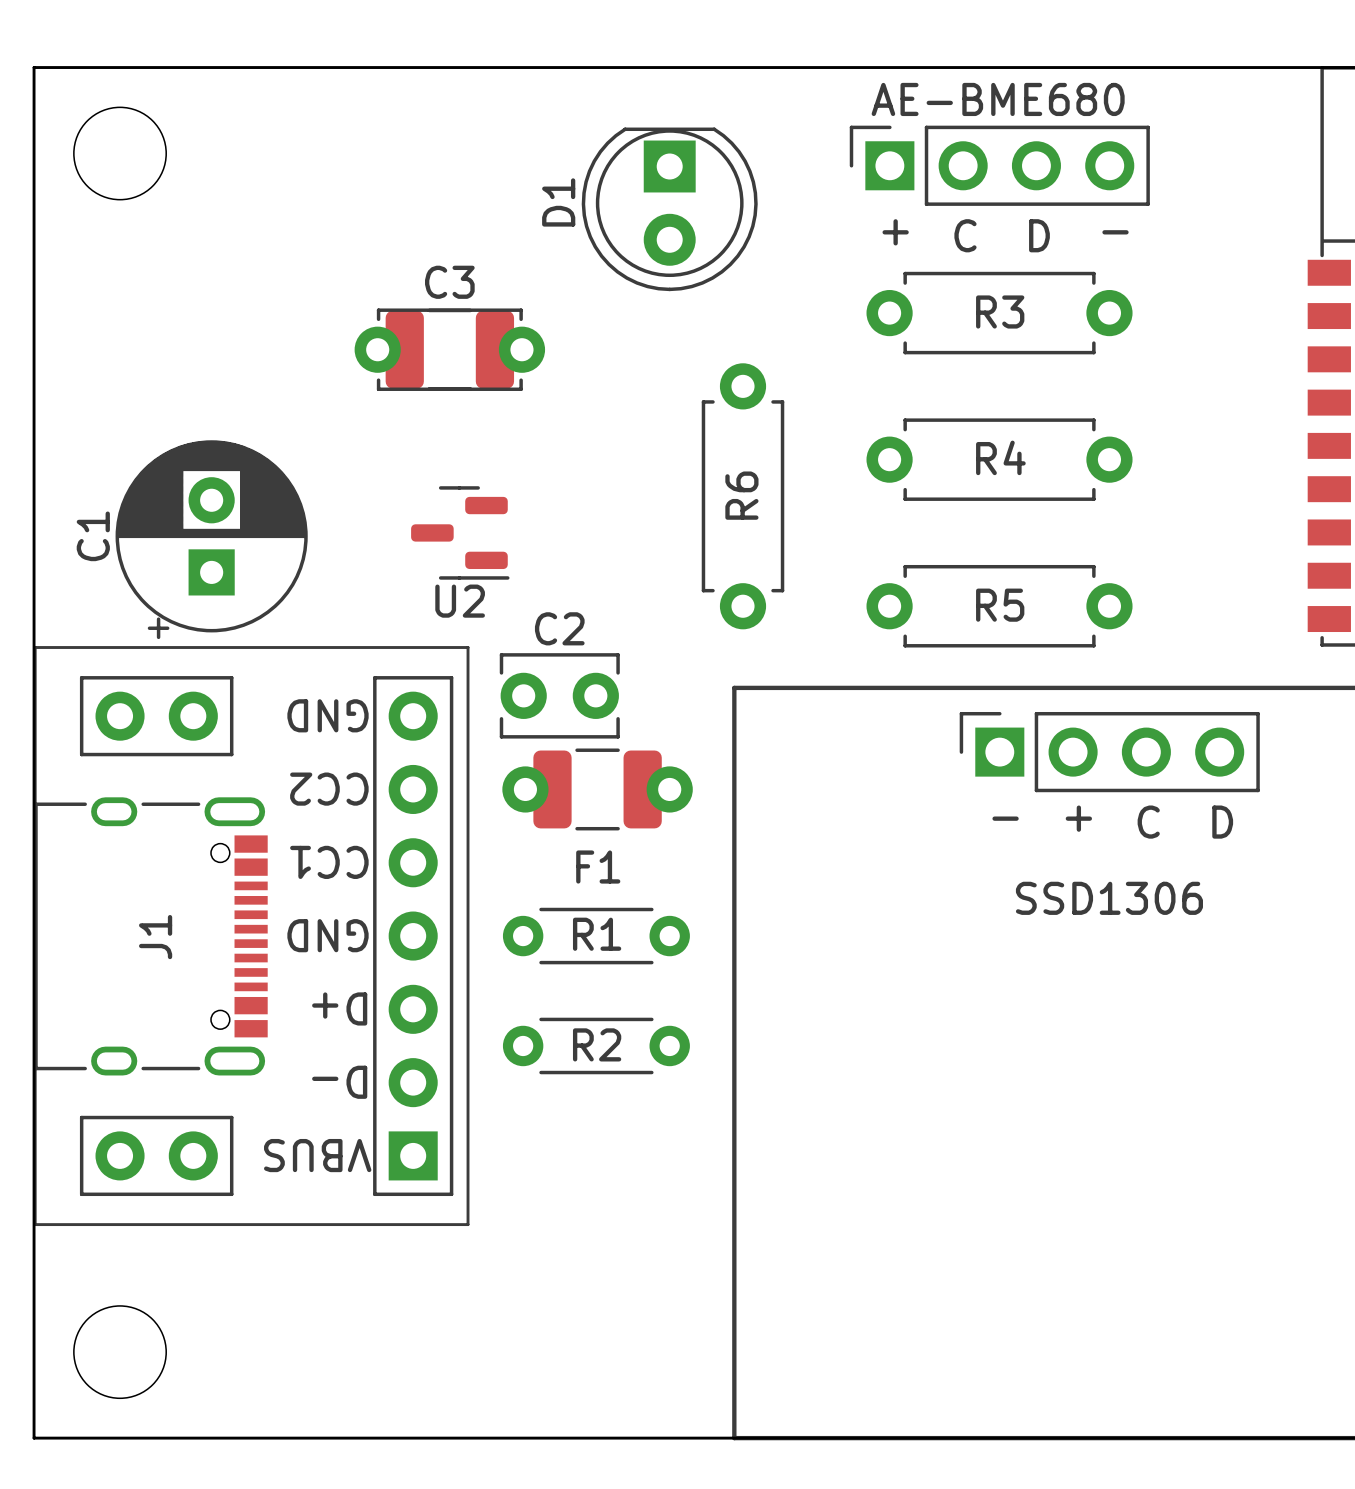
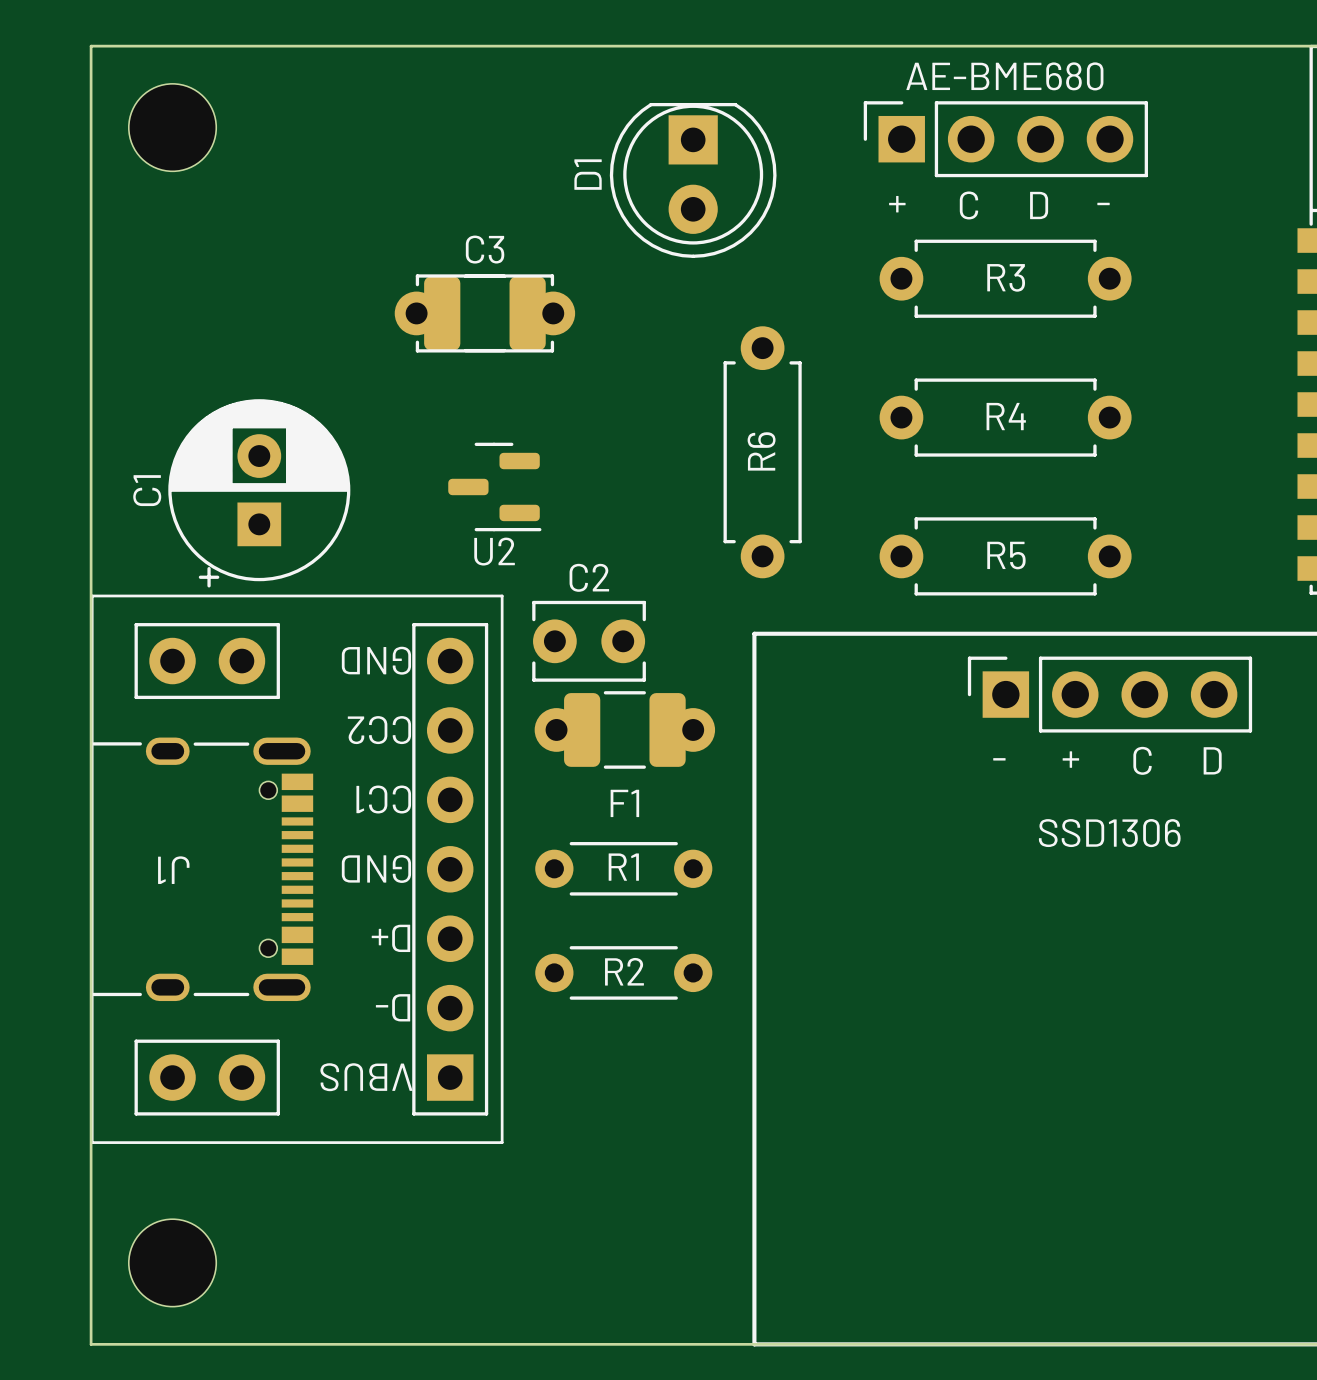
J1 footprint: [34, 797, 268, 1076] -> [90, 594, 504, 1144]
part: (251, 936) -> none
J1 name position: J1 (155, 937) -> J1 (173, 870)

